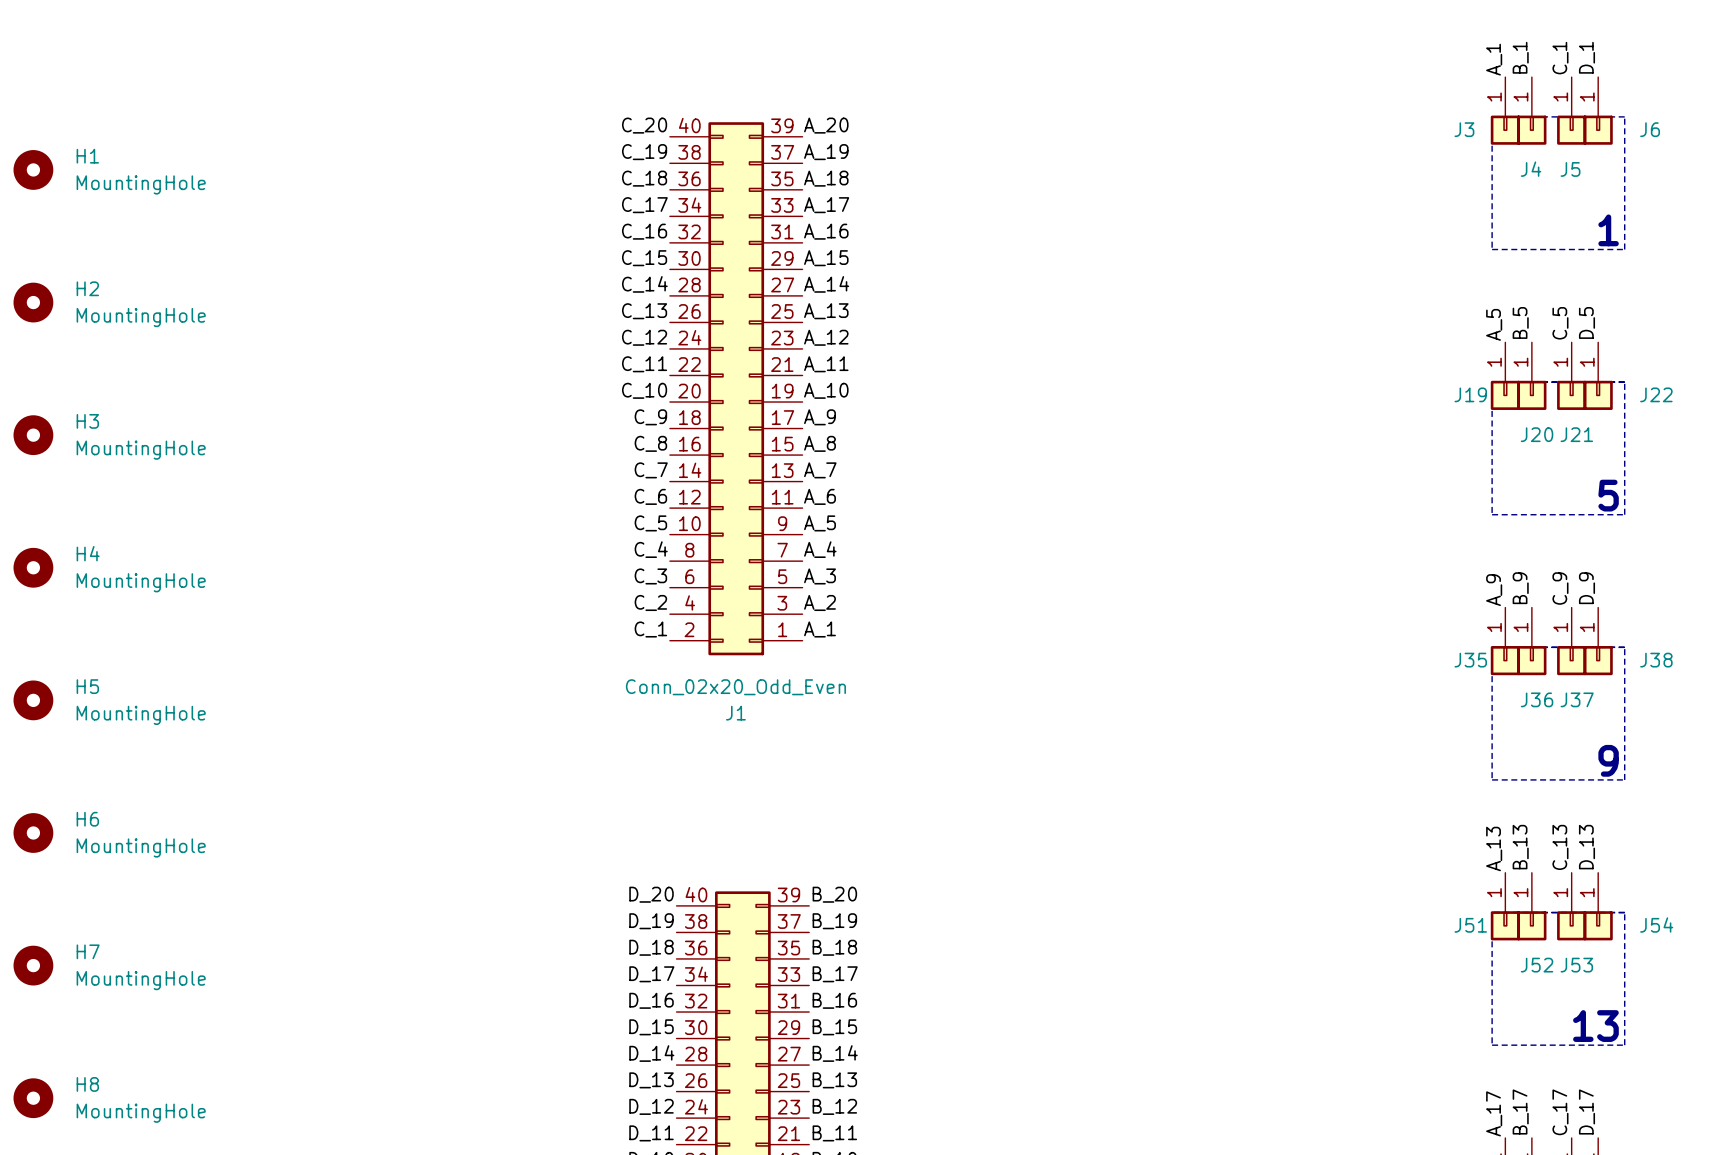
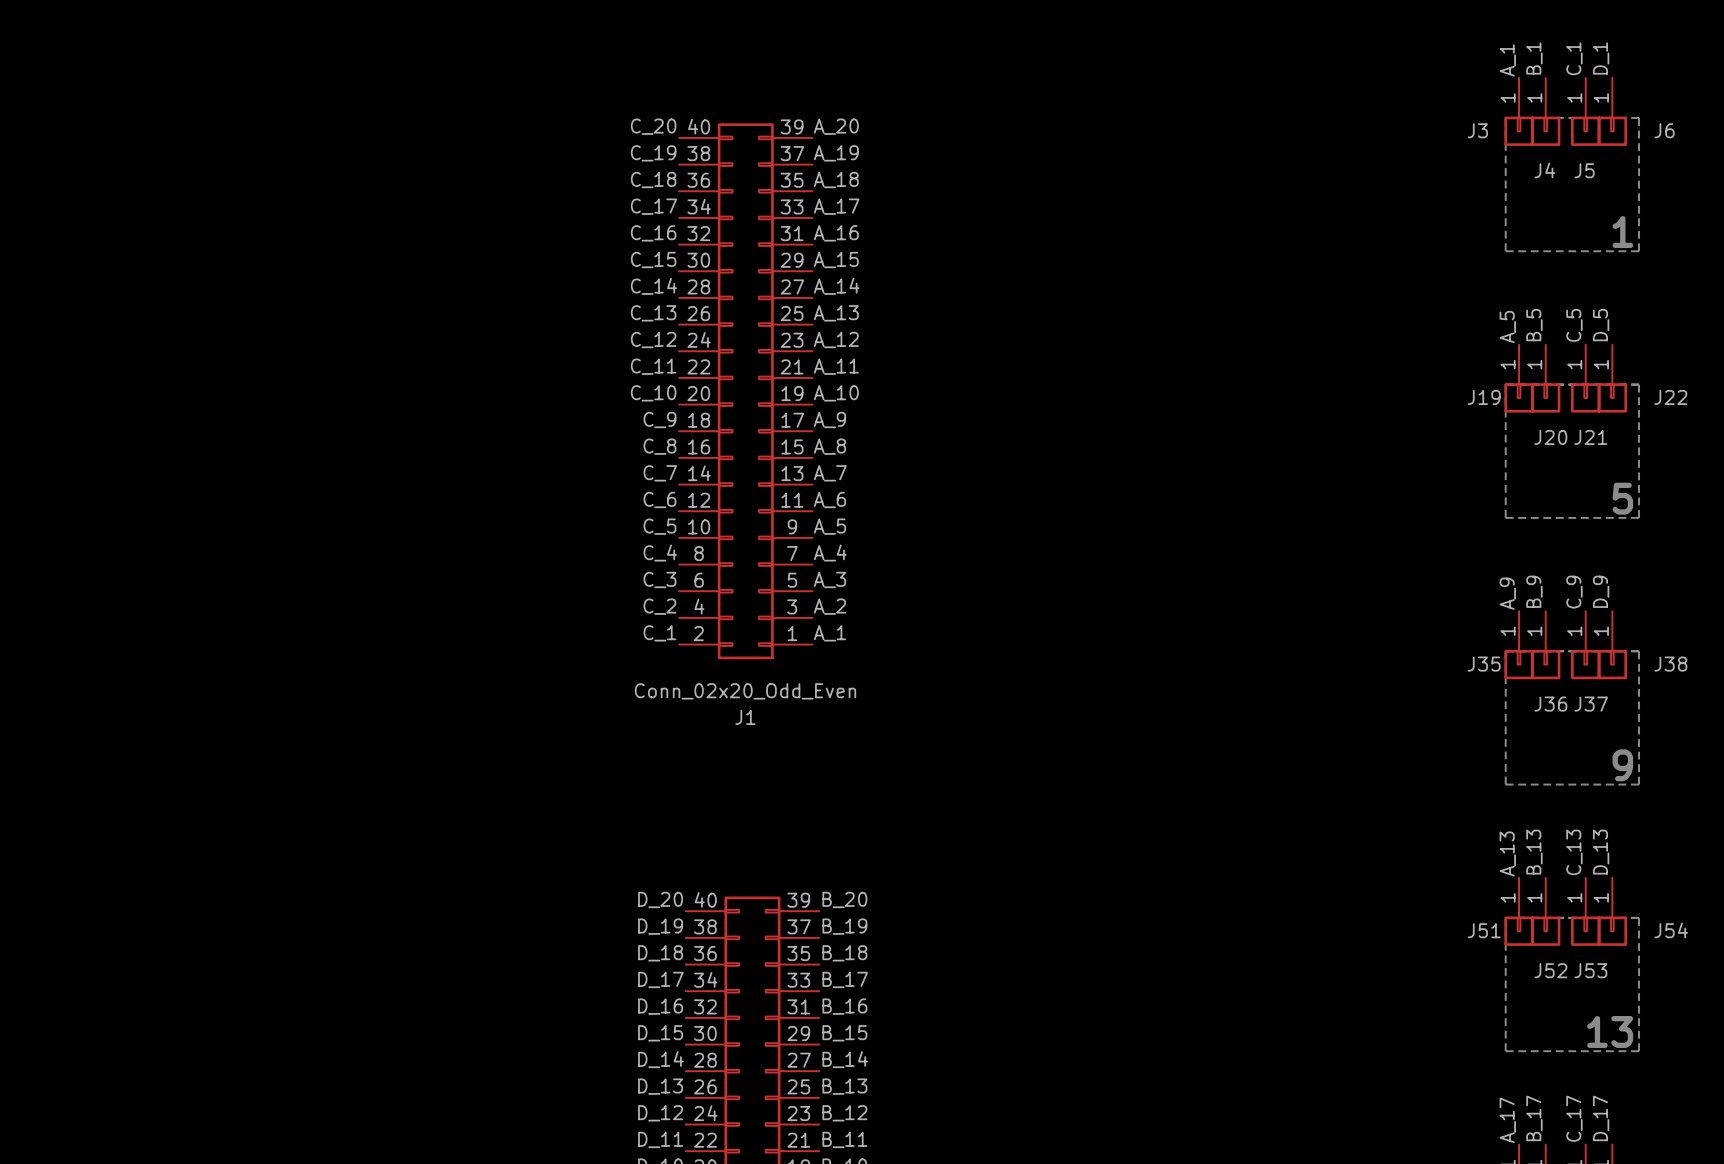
H1: MountingHole (33, 169) -> none
H2: MountingHole (33, 302) -> none
H3: MountingHole (33, 435) -> none
H4: MountingHole (33, 567) -> none
H5: MountingHole (33, 700) -> none
H6: MountingHole (33, 832) -> none
H7: MountingHole (33, 965) -> none
H8: MountingHole (33, 1098) -> none

